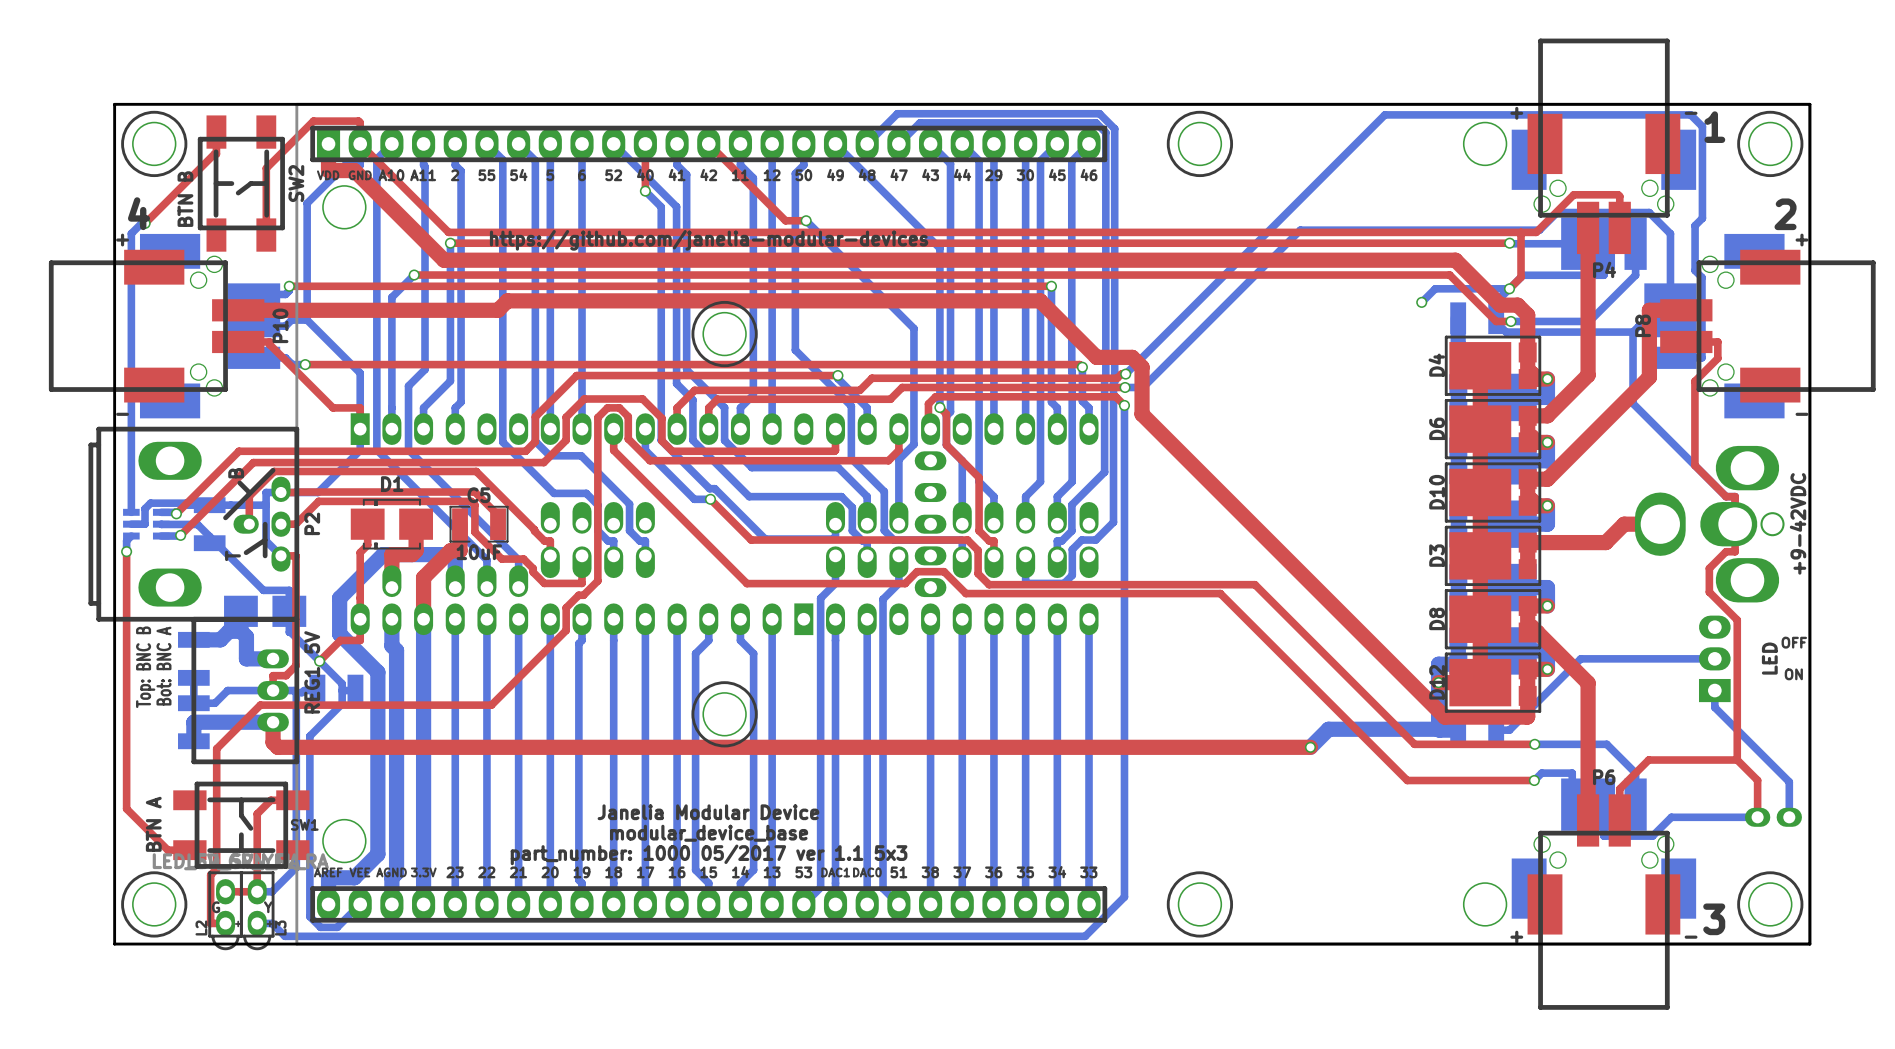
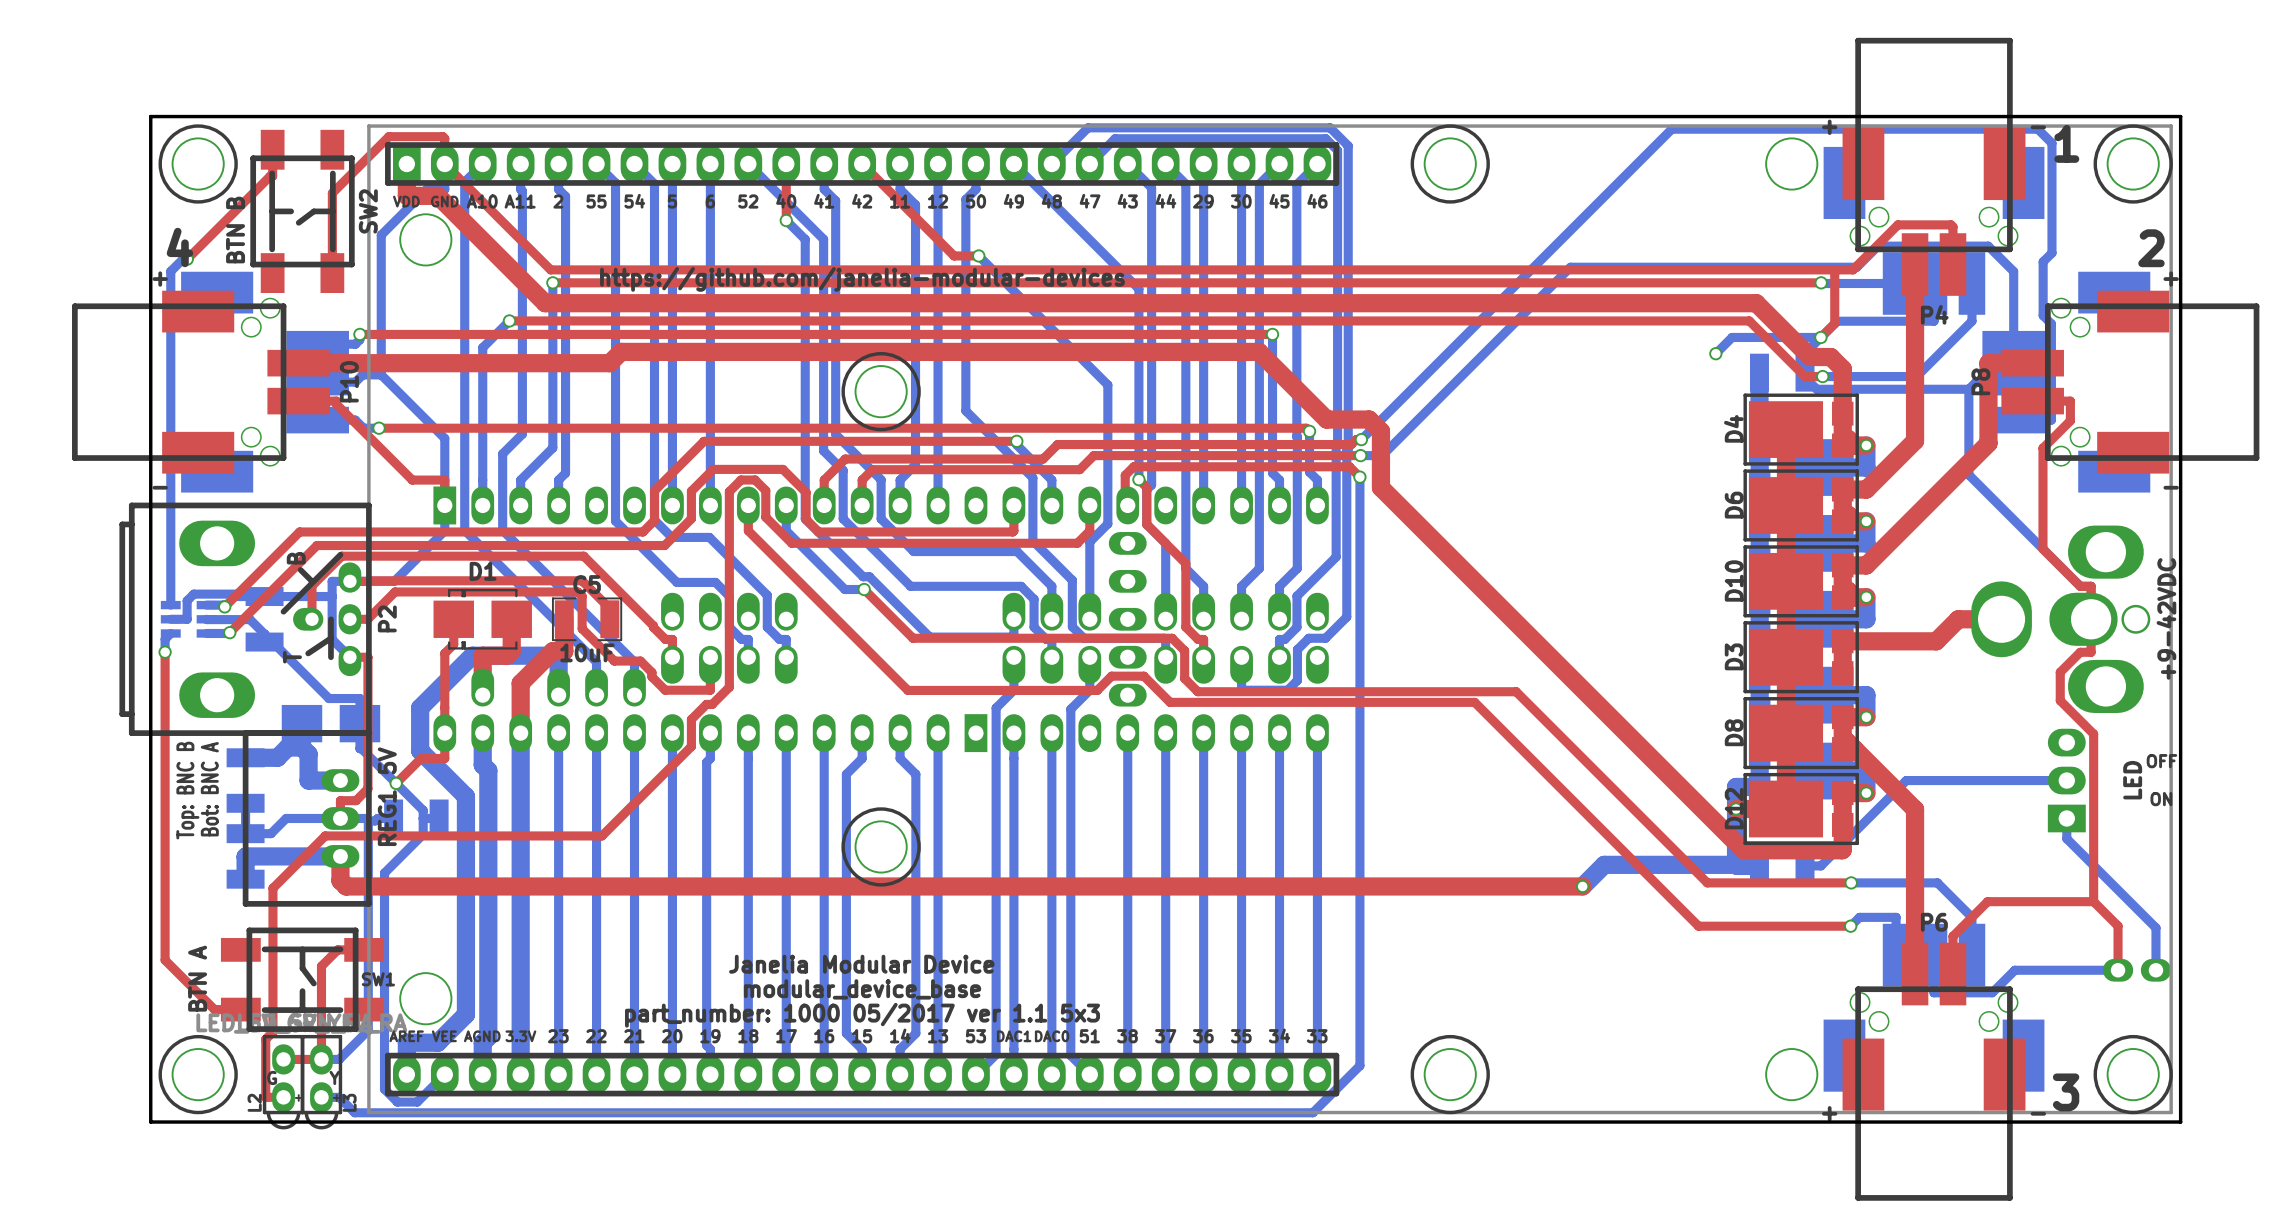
part footprint: [295, 102, 1812, 946] -> [367, 124, 2173, 1115]

